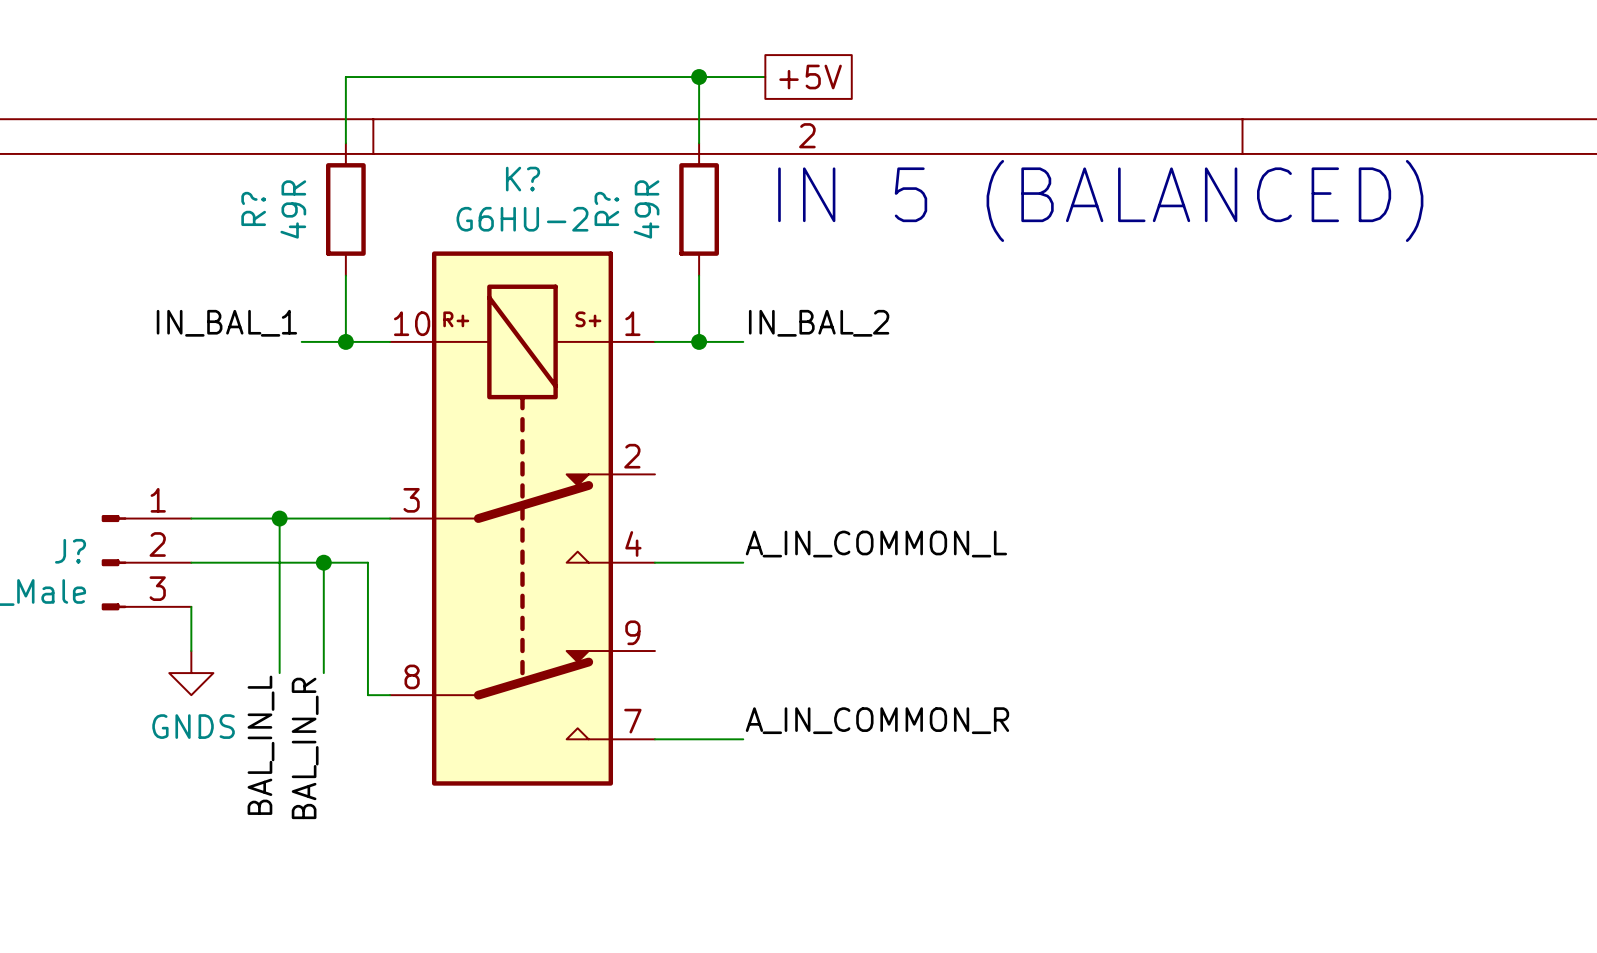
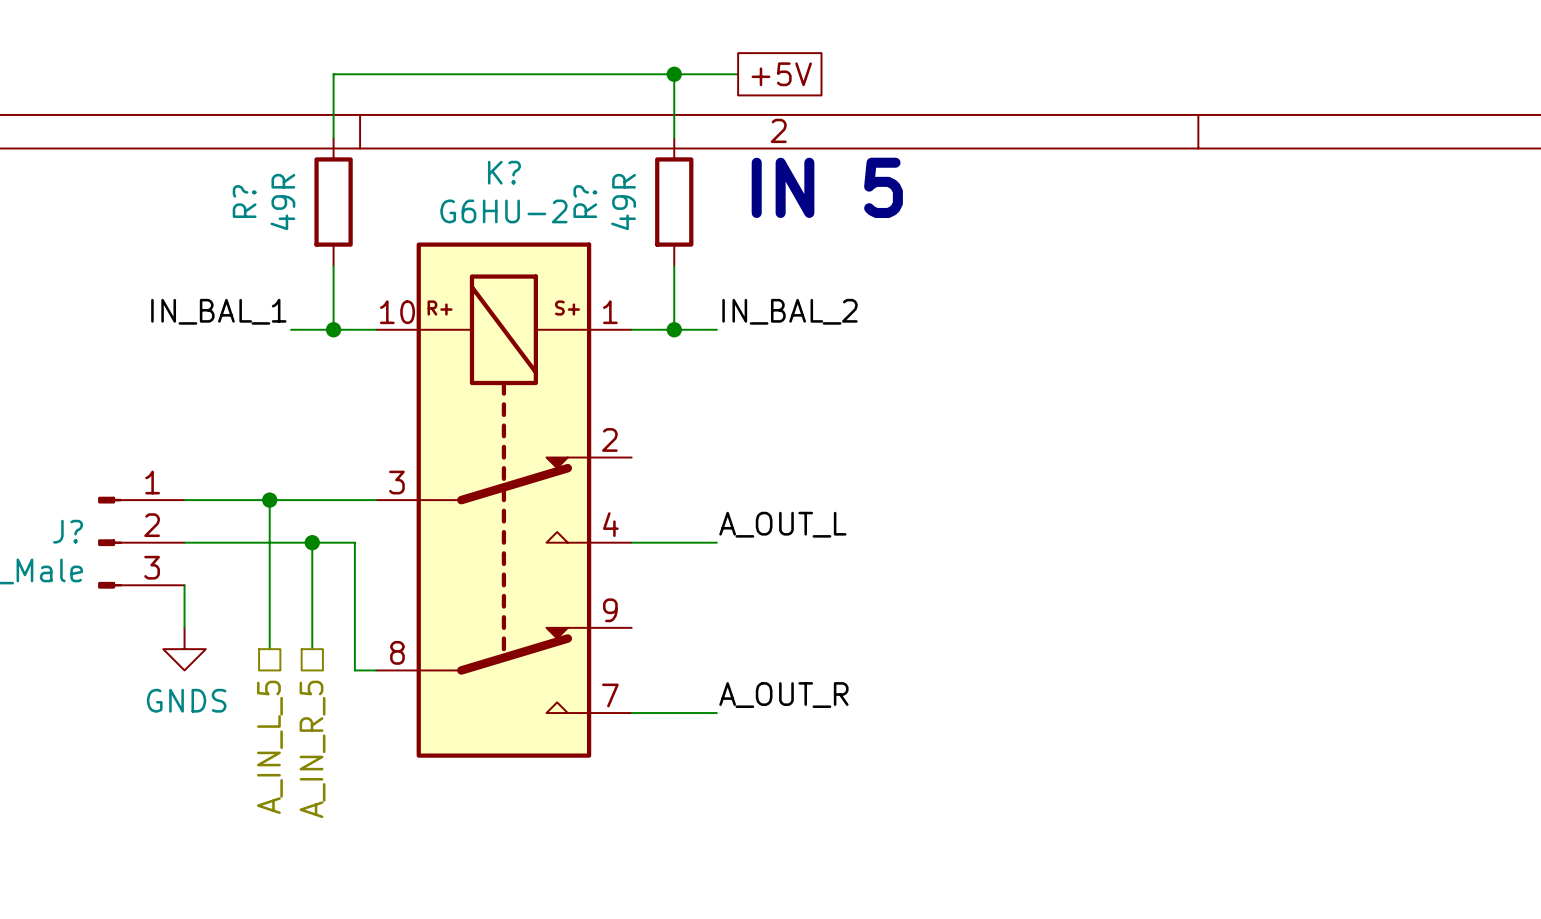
text: IN 5 (BALANCED) (1100, 200) -> IN 5 (827, 187)
label: A_IN_COMMON_L (876, 544) -> A_OUT_L (782, 524)
label: A_IN_COMMON_R (877, 720) -> A_OUT_R (783, 695)
label: BAL_IN_L (261, 745) -> none
label: BAL_IN_R (305, 748) -> none
hierarchical label: none -> A_IN_L_5 (269, 747)
hierarchical label: none -> A_IN_R_5 (312, 749)

